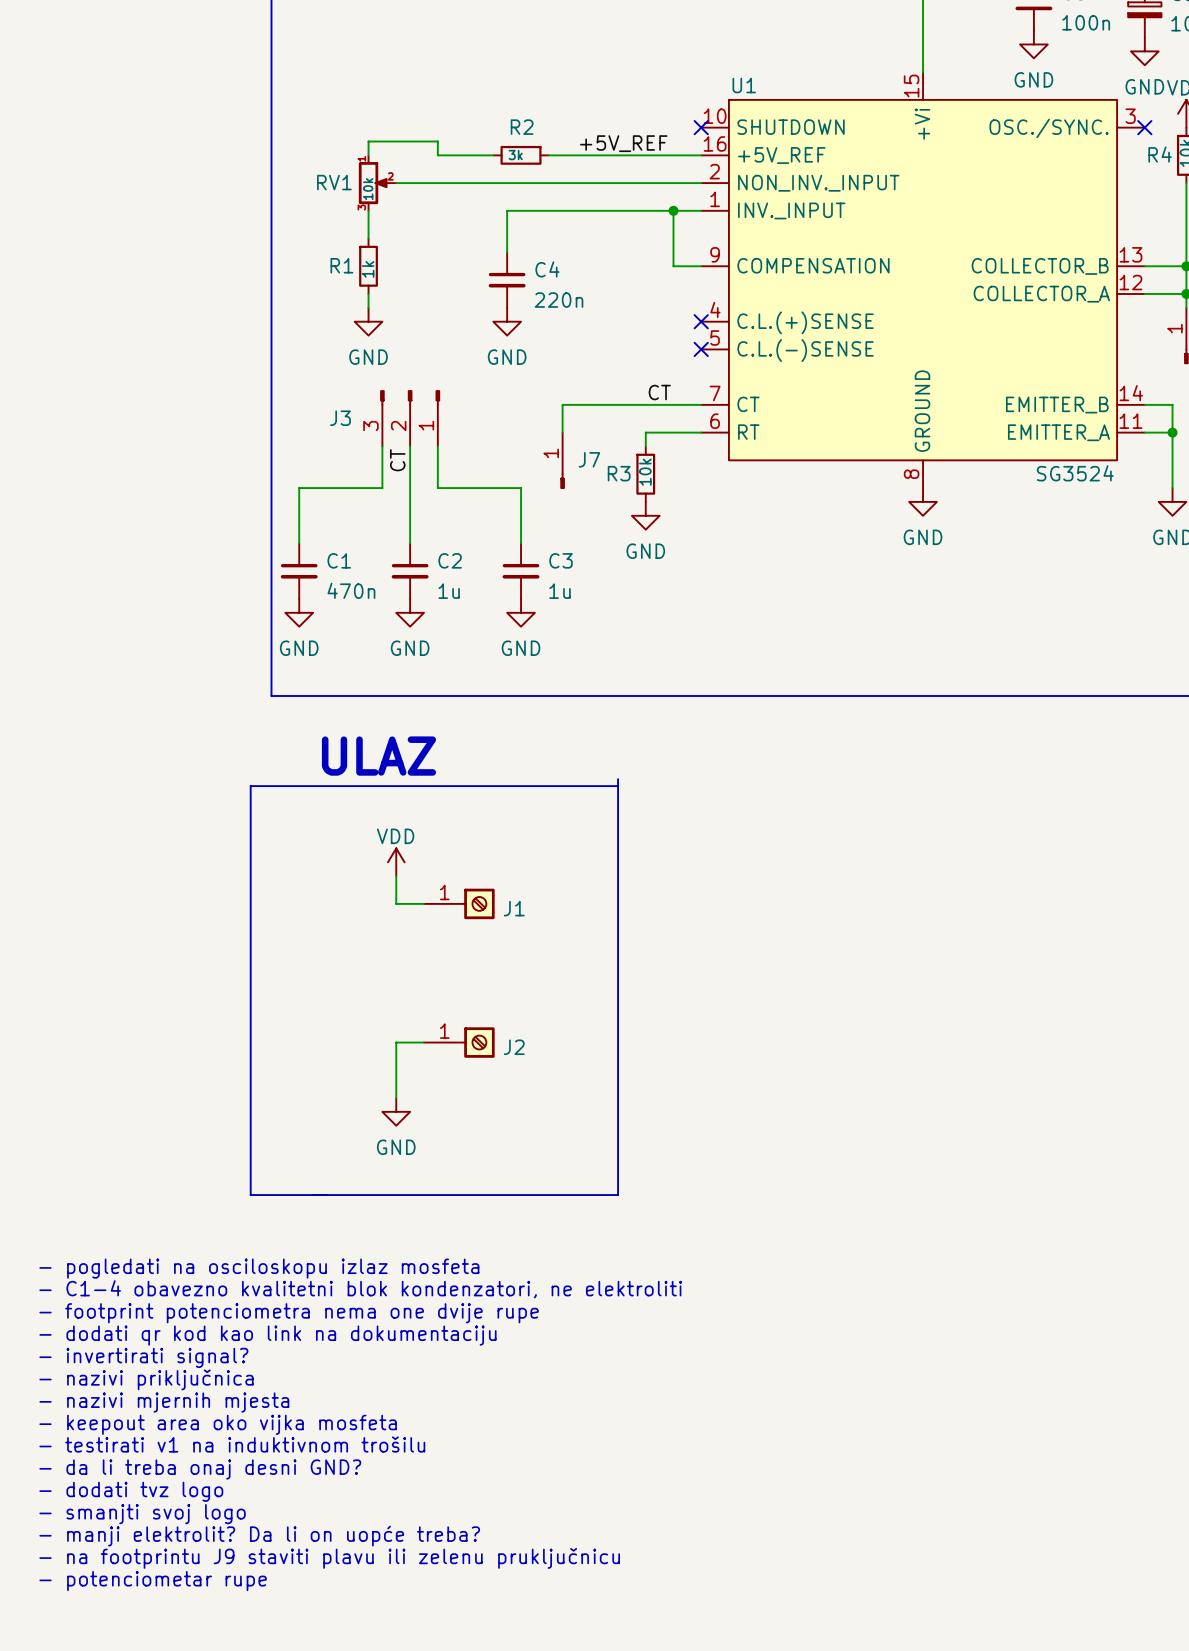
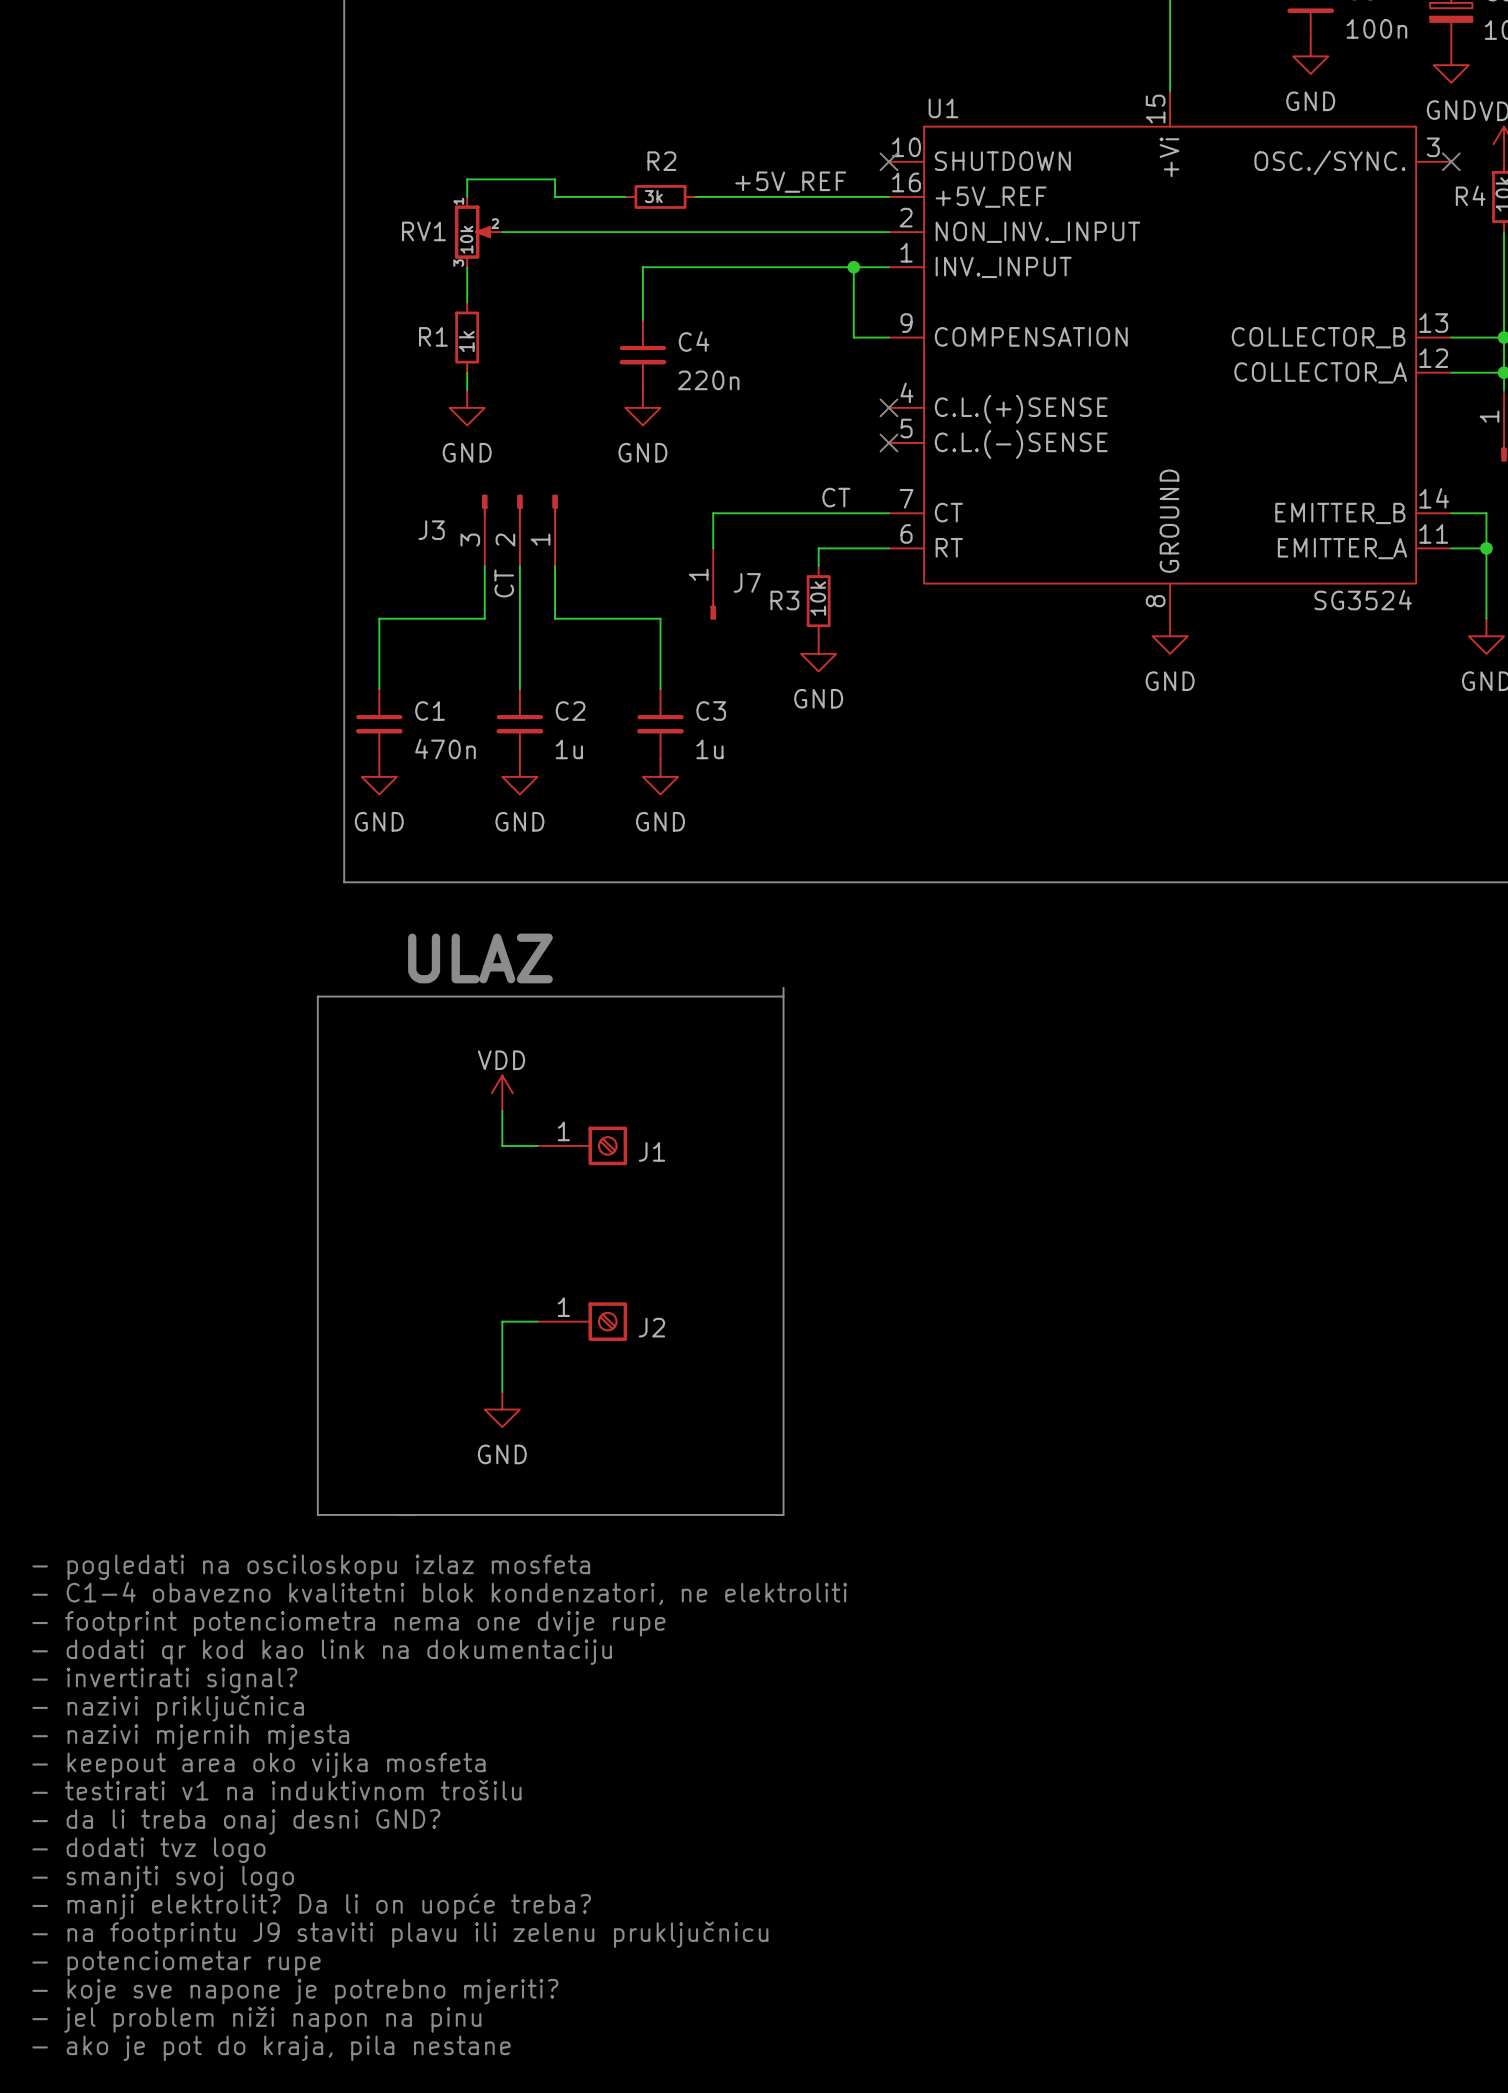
text position: - pogledati na osciloskopu izlaz mosfeta (259, 1268) -> - pogledati na osciloskopu izlaz mosfeta (311, 1567)
text position: - C1-4 obavezno kvalitetni blok kondenzatori, ne elektroliti (360, 1289) -> - C1-4 obavezno kvalitetni blok kondenzatori, ne elektroliti (439, 1593)
text position: - footprint potenciometra nema one dvije rupe (289, 1313) -> - footprint potenciometra nema one dvije rupe (348, 1623)
text position: - dodati qr kod kao link na dokumentaciju (267, 1335) -> - dodati qr kod kao link na dokumentaciju (322, 1652)
text position: - invertirati signal? (143, 1357) -> - invertirati signal? (164, 1680)
text position: - nazivi priključnica (146, 1379) -> - nazivi priključnica (168, 1708)
text position: - nazivi mjernih mjesta (164, 1402) -> - nazivi mjernih mjesta (190, 1737)
text position: - keepout area oko vijka mosfeta (218, 1424) -> - keepout area oko vijka mosfeta (258, 1765)
text position: - testirati v1 na induktivnom trošilu (232, 1444) -> - testirati v1 na induktivnom trošilu (276, 1790)
text position: - da li treba onaj desni GND? (200, 1469) -> - da li treba onaj desni GND? (236, 1821)
text position: - dodati tvz logo (131, 1491) -> - dodati tvz logo (148, 1850)
text position: - smanjti svoj logo (142, 1514) -> - smanjti svoj logo (163, 1878)
text position: - manji elektrolit? Da li on uopće treba? (259, 1536) -> - manji elektrolit? Da li on uopće treba? (311, 1906)
text position: - na footprintu J9 staviti plavu ili zelenu pruključnicu (329, 1558) -> - na footprintu J9 staviti plavu ili zelenu pruključnicu (400, 1934)
text: none -> - koje sve napone je potrebno mjeriti? (295, 1991)
text position: - potenciometar rupe (153, 1581) -> - potenciometar rupe (176, 1963)
text: none -> - jel problem niži napon na pinu (256, 2019)
text: none -> - ako je pot do kraja, pila nestane (271, 2048)

